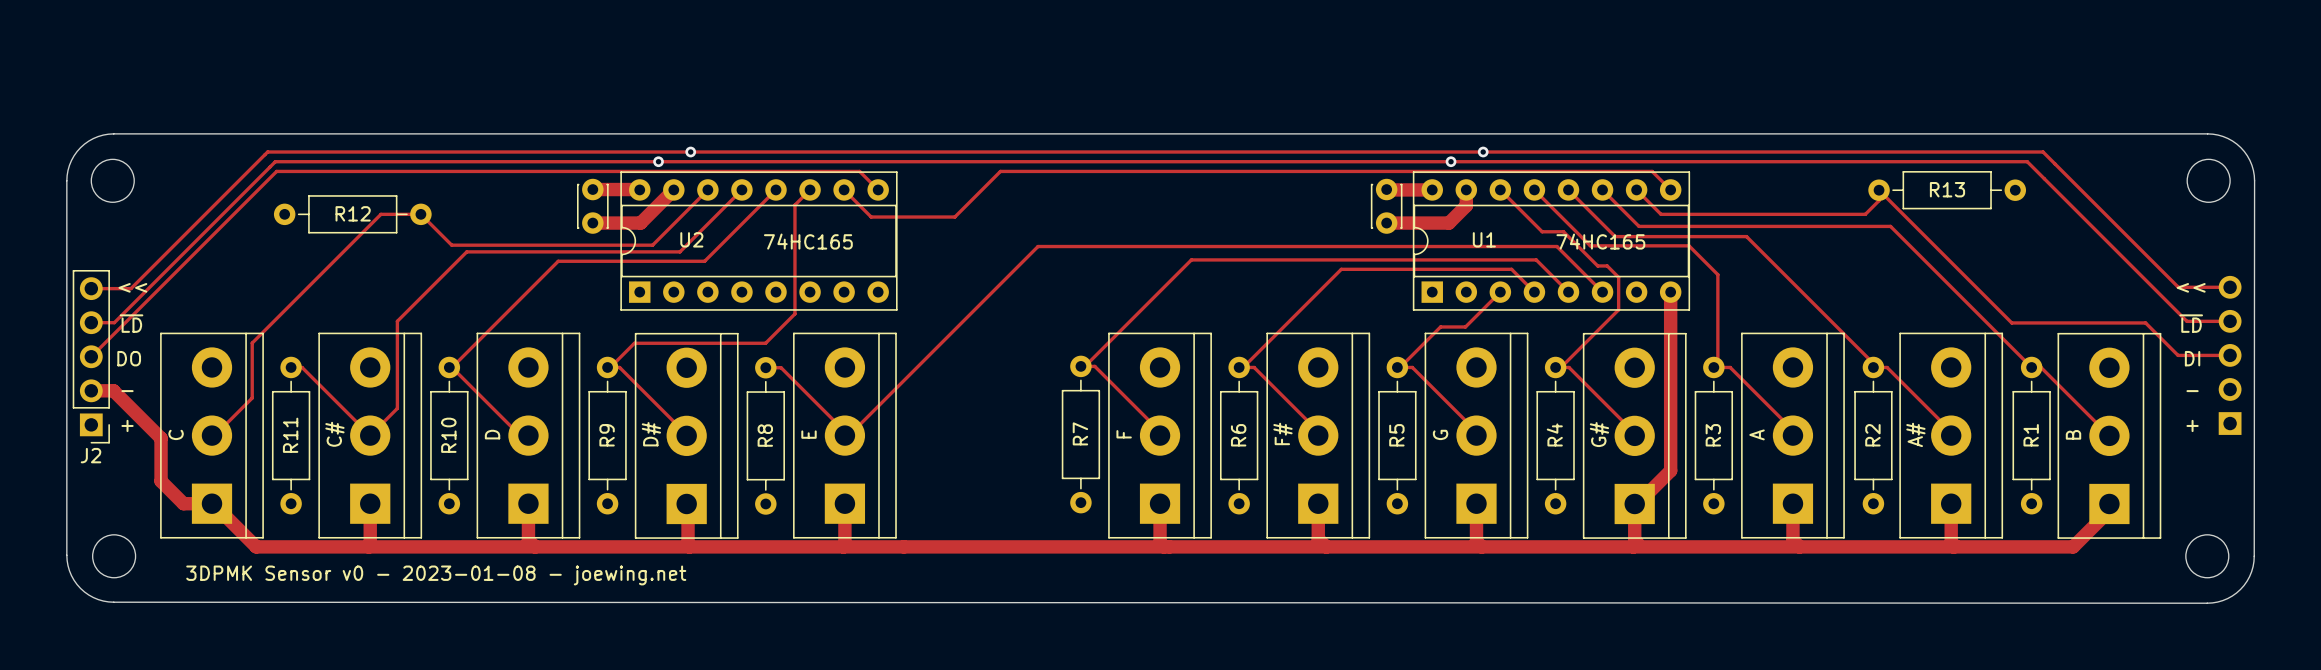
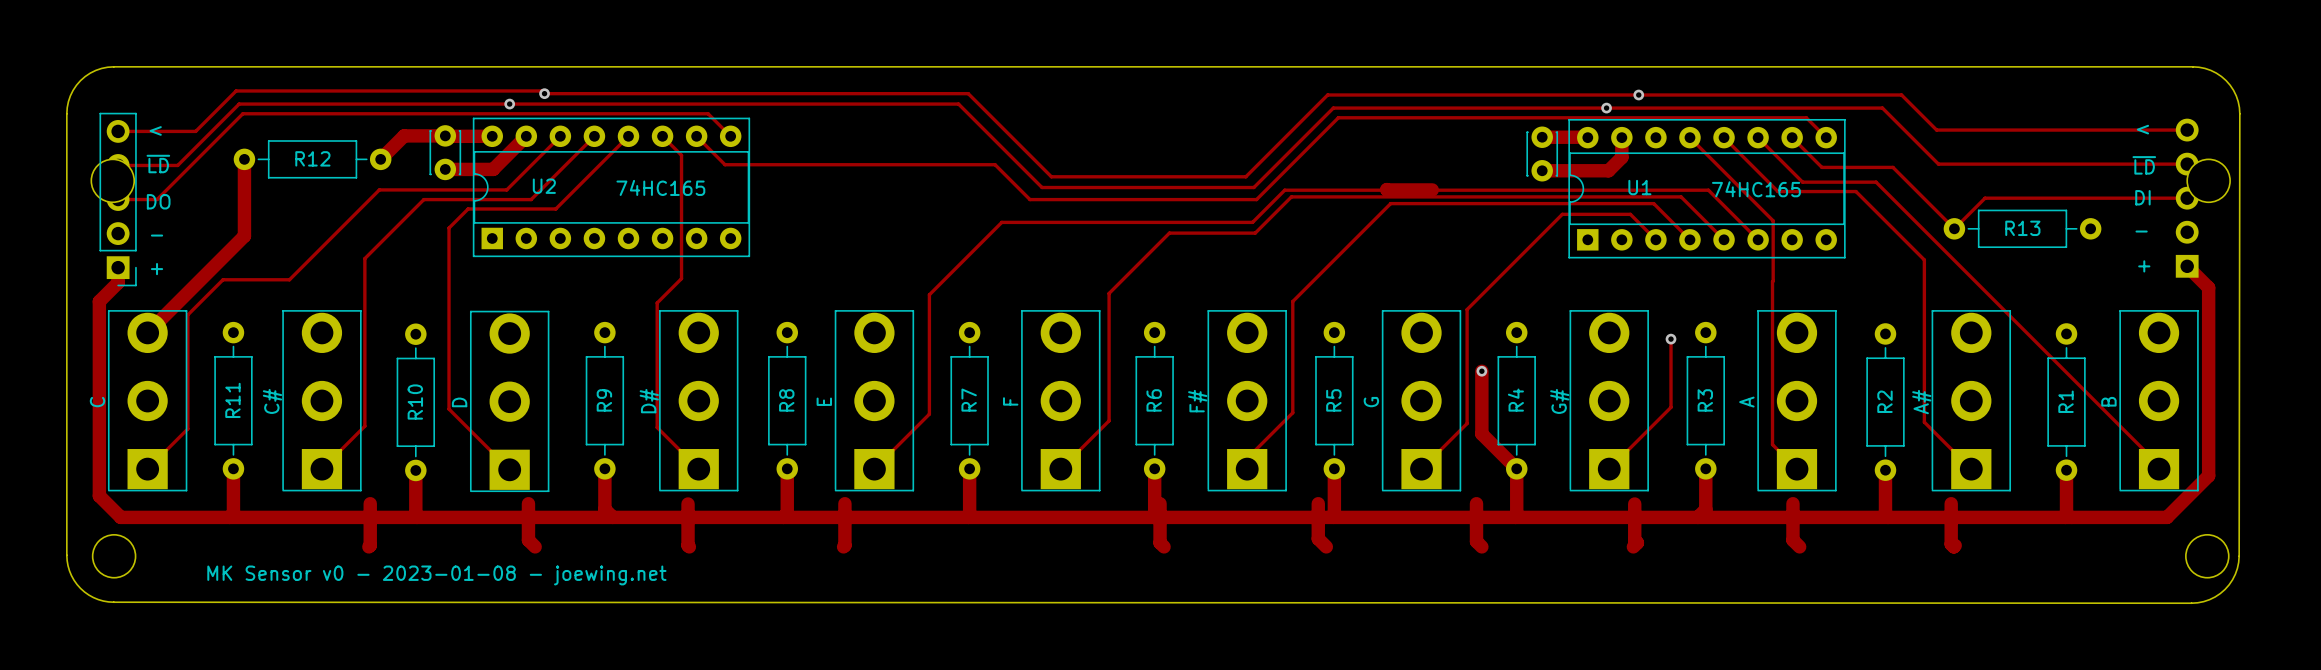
via: none -> (544, 93)
via: none -> (1638, 95)
via: none -> (509, 104)
via: none -> (1606, 108)
text: none -> < (2142, 129)
text: none -> < (155, 130)
track: none -> (2187, 130) (1936, 130) (1901, 95) (1327, 95) (1245, 176) (1051, 176) (968, 93) (544, 93) (541, 90) (236, 90) (195, 131) (118, 131)
track: none -> (492, 136) (404, 135) (380, 159)
track: none -> (560, 136) (506, 189) (379, 189) (289, 279) (222, 279) (187, 314) (187, 428) (147, 469)
track: none -> (594, 136) (531, 199) (423, 199) (364, 258) (364, 426) (321, 469)
track: none -> (628, 136) (555, 208) (468, 208) (449, 228) (449, 409) (509, 469)
track: none -> (662, 136) (681, 155) (681, 278) (657, 302) (657, 427) (698, 469)
track: none -> (696, 136) (725, 164) (995, 164) (1029, 199) (1256, 199) (1338, 117) (1806, 117) (1826, 137)
track: none -> (730, 136) (708, 113) (242, 113) (157, 199) (118, 199)
track: none -> (1542, 137) (1587, 137)
track: none -> (1621, 137) (1621, 157) (1608, 170) (1542, 170)
track: none -> (1689, 137) (1773, 220) (1772, 444) (1796, 469)
track: none -> (1724, 137) (1777, 191) (1855, 191) (1924, 259) (1924, 422) (1971, 469)
track: none -> (1758, 137) (1802, 182) (1876, 182) (2159, 465) (2159, 469)
track: none -> (1792, 137) (1821, 167) (1892, 167) (1954, 228) (1985, 198) (2187, 198)
via: (690, 152) -> none
via: (1483, 152) -> none
track: none -> (244, 159) (244, 236) (147, 332)
via: (658, 161) -> none
via: (1451, 161) -> none
track: none -> (2187, 164) (1938, 164) (1882, 108) (1333, 108) (1253, 187) (1042, 187) (958, 104) (239, 104) (177, 165) (118, 165)
board edge: (66, 180) (71, 160) (80, 147) (98, 136) (113, 133) (2218, 135) (2228, 138) (2240, 147) (2249, 160) (2254, 175) (2253, 561) (2247, 581) (2232, 596) (2217, 602) (2191, 603) -> (66, 180) (66, 113) (70, 95) (76, 85) (85, 76) (101, 68) (113, 66) (2199, 67) (2210, 70) (2226, 80) (2233, 90) (2239, 107) (2239, 556) (2235, 574) (2224, 589) (2209, 599) (2191, 603)
track: (592, 189) (639, 189) -> none
track: (673, 189) (640, 223) (592, 223) -> (526, 136) (493, 169) (445, 169)
track: (707, 189) (652, 245) (451, 245) (420, 214) (380, 214) (252, 343) (252, 398) (214, 435) -> none
track: (741, 189) (679, 251) (466, 251) (397, 321) (397, 408) (370, 435) (302, 367) (291, 367) -> none
track: (775, 189) (704, 261) (558, 261) (452, 367) (520, 435) (528, 435) -> none
track: (810, 189) (794, 205) (794, 313) (765, 343) (634, 343) (610, 367) (619, 367) (688, 435) -> none
track: (844, 189) (871, 217) (954, 217) (1000, 171) (1652, 171) (1670, 189) -> none
track: (878, 189) (859, 171) (276, 171) (91, 356) -> none
track: (1466, 189) (1466, 205) (1449, 223) (1386, 223) -> none
track: (1500, 189) (1542, 231) (1563, 231) (1597, 265) (1607, 265) (1618, 277) (1618, 309) (1560, 367) (1569, 367) (1637, 435) -> none
track: (1534, 189) (1590, 245) (1689, 245) (1717, 274) (1717, 367) (1730, 367) (1798, 435) -> none
track: (1568, 189) (1615, 236) (1746, 236) (1877, 367) (1887, 367) (1955, 435) -> none
track: (1602, 189) (1639, 226) (1890, 226) (2031, 367) (2041, 367) (2109, 435) -> none
track: (1636, 189) (1661, 214) (1865, 214) (1879, 200) (1879, 190) (2011, 322) (2145, 322) (2178, 355) (2230, 355) -> none
R13 position: (1947, 190) -> (2022, 228)
part: none -> (118, 199)
part position: (592, 206) -> (445, 152)
part position: (1386, 206) -> (1542, 154)
R12 position: (352, 214) -> (312, 159)
track: none -> (1655, 239) (1630, 214) (1562, 214) (1467, 309) (1467, 423) (1421, 469)
track: none -> (1689, 239) (1653, 203) (1390, 203) (1292, 301) (1292, 412) (1247, 458) (1247, 469)
track: none -> (1724, 239) (1681, 196) (1291, 196) (1255, 233) (1169, 233) (1109, 293) (1109, 420) (1060, 469)
track: none -> (1758, 239) (1708, 190) (1284, 190) (1252, 222) (1001, 222) (929, 294) (929, 414) (874, 469)
U2 position: (758, 241) -> (611, 187)
U1 position: (1551, 241) -> (1707, 188)
track: none -> (2187, 266) (2208, 287) (2208, 475) (2167, 517) (120, 517) (99, 495) (99, 301) (118, 282) (118, 267)
text: << (132, 287) -> none
text: << (2191, 287) -> none
track: (2230, 287) (2178, 287) (2043, 152) (267, 152) (131, 288) (91, 288) -> none
track: (1500, 292) (1465, 326) (1440, 326) (1400, 367) (1412, 367) (1480, 435) -> none
track: (1534, 292) (1511, 269) (1341, 269) (1243, 367) (1254, 367) (1322, 435) -> none
track: (1568, 292) (1536, 259) (1191, 259) (1084, 366) (1094, 366) (1164, 435) -> none
track: (1602, 292) (1556, 246) (1038, 246) (848, 435) (781, 367) (768, 367) -> none
track: (1670, 292) (1670, 470) (1637, 503) -> none
track: (2230, 321) (2186, 321) (2027, 161) (275, 161) (114, 322) (91, 322) -> none
text position: ~{LD} (131, 323) -> ~{LD} (158, 164)
text position: ~{LD} (2191, 323) -> ~{LD} (2144, 165)
track: none -> (1671, 339) (1671, 407) (1609, 469)
via: none -> (1671, 339)
part position: (2230, 355) -> (2187, 198)
J2: (91, 356) -> none
text position: DO (129, 358) -> DO (158, 201)
text position: DI (2192, 358) -> DI (2142, 197)
track: none -> (1481, 371) (1481, 433) (1516, 468) (1515, 517)
via: none -> (1481, 371)
track: (91, 390) (113, 390) (161, 438) (161, 481) (183, 503) (212, 503) -> none
text position: - (127, 391) -> - (157, 235)
text position: - (2192, 391) -> - (2141, 231)
part: none -> C (147, 400)
part: none -> C# (321, 400)
part: none -> D# (698, 400)
part: none -> E (874, 400)
part: none -> F (1060, 400)
part: none -> F# (1247, 400)
part: none -> G (1421, 400)
part: none -> G# (1609, 400)
part: none -> A (1796, 400)
part: none -> A# (1971, 400)
part: none -> B (2159, 400)
part: none -> D (509, 401)
text position: + (127, 425) -> + (157, 269)
text position: + (2192, 425) -> + (2144, 266)
R7 position: (1080, 434) -> (969, 400)
part: C (212, 435) -> none
R11 position: (291, 435) -> (233, 400)
part: C# (370, 435) -> none
R10 position: (449, 435) -> (415, 402)
part: D (528, 435) -> none
R9 position: (607, 435) -> (604, 400)
part: D# (686, 435) -> none
R8 position: (765, 435) -> (787, 400)
part: E (844, 435) -> none
part: F (1160, 435) -> none
R6 position: (1239, 435) -> (1154, 400)
part: F# (1318, 435) -> none
R5 position: (1397, 435) -> (1334, 400)
part: G (1476, 435) -> none
R4 position: (1555, 435) -> (1516, 400)
part: G# (1634, 435) -> none
R3 position: (1713, 435) -> (1705, 400)
part: A (1792, 435) -> none
R2 position: (1873, 435) -> (1885, 402)
part: A# (1951, 435) -> none
R1 position: (2031, 435) -> (2066, 402)
part: B (2109, 435) -> none
track: none -> (233, 468) (233, 513) (229, 517)
track: none -> (604, 468) (604, 509) (612, 517)
track: none -> (787, 468) (787, 513) (783, 517)
track: none -> (969, 468) (968, 517)
track: none -> (1154, 468) (1153, 517)
track: none -> (1334, 468) (1333, 517)
track: none -> (1705, 468) (1705, 509) (1697, 517)
track: none -> (415, 470) (417, 517)
track: none -> (1885, 470) (1885, 514) (1888, 517)
track: none -> (2066, 470) (2065, 517)
track: (214, 503) (256, 546) (2073, 546) (2109, 510) (2109, 503) -> none
text: 3DPMK Sensor v0 - 2023-01-08 - joewing.net (436, 575) -> MK Sensor v0 - 2023-01-08 - joewing.net (436, 575)

